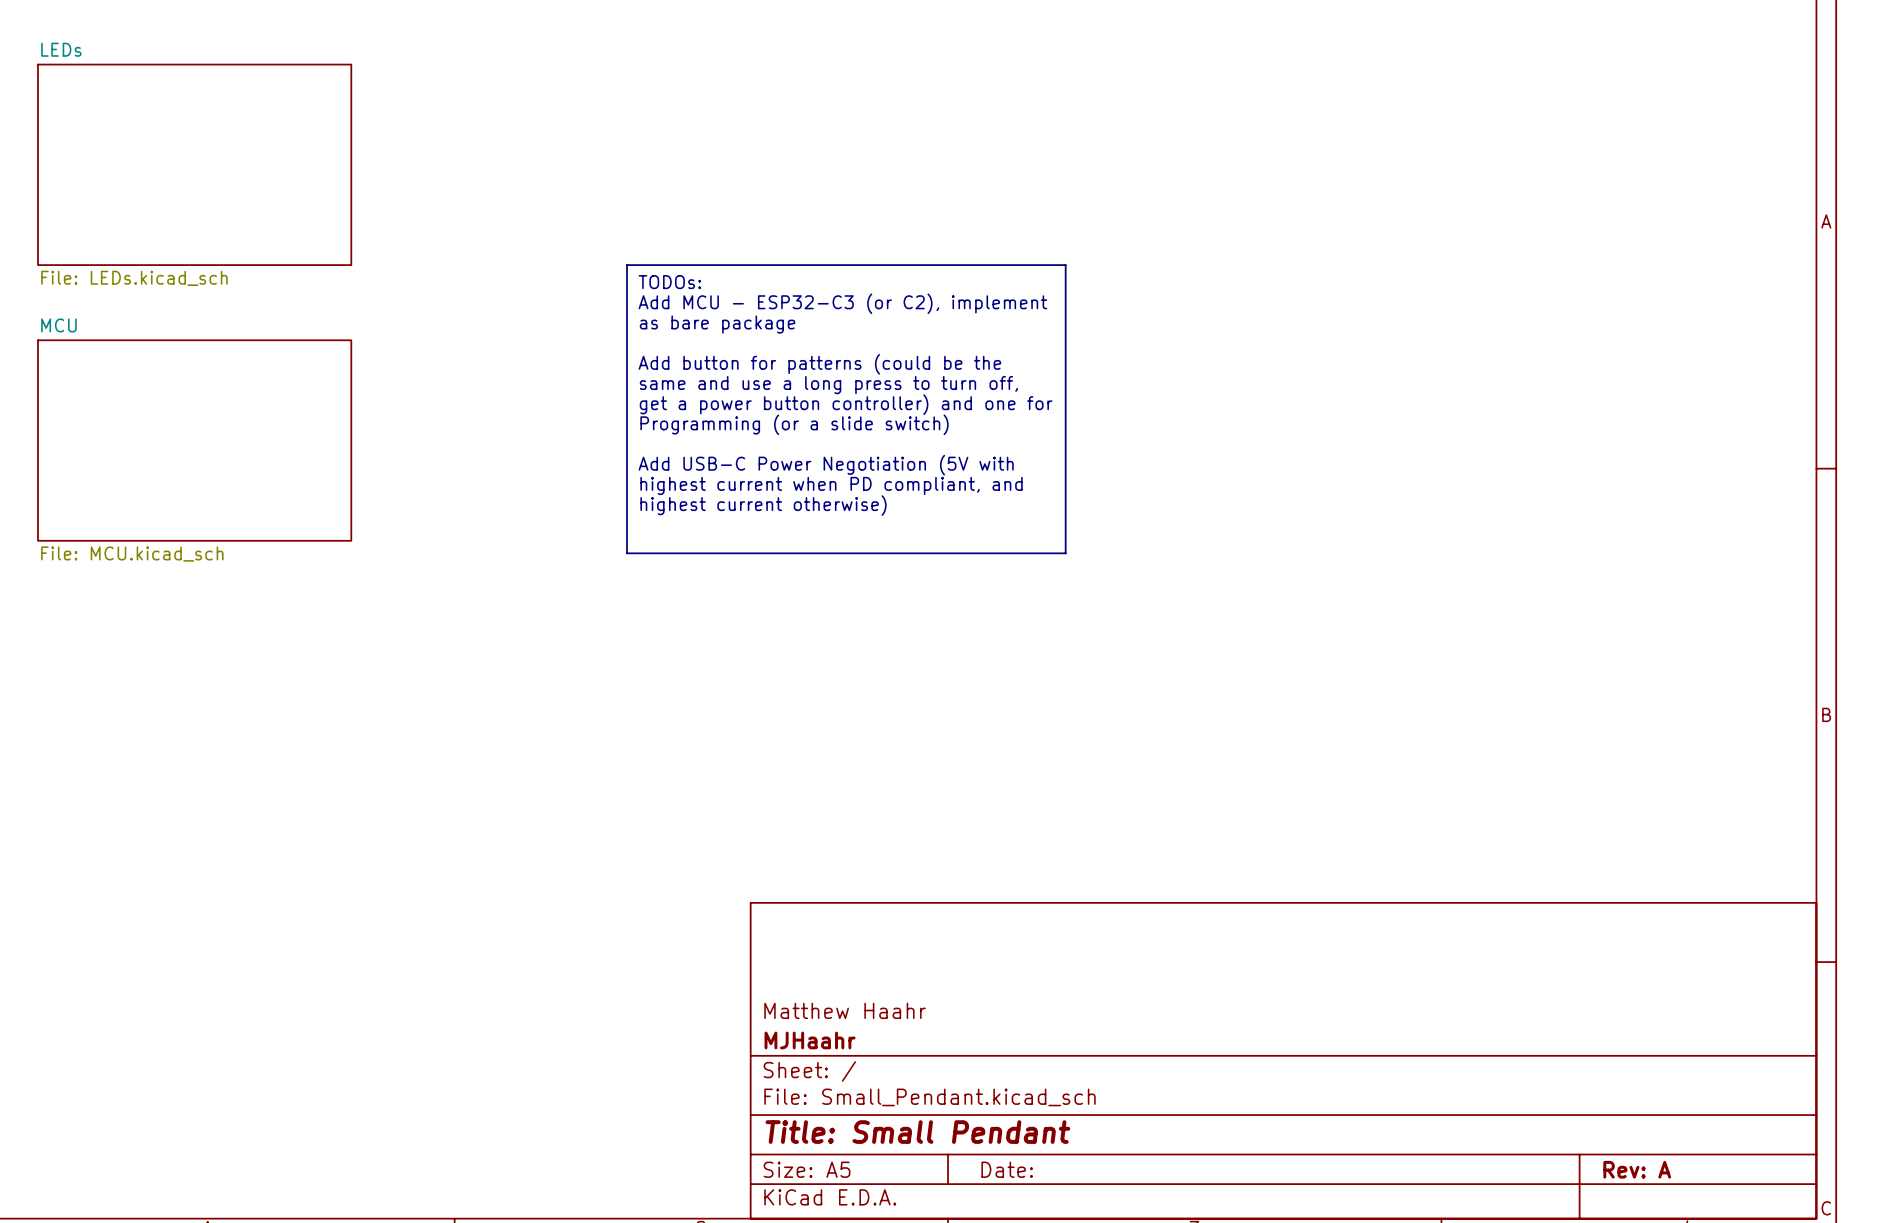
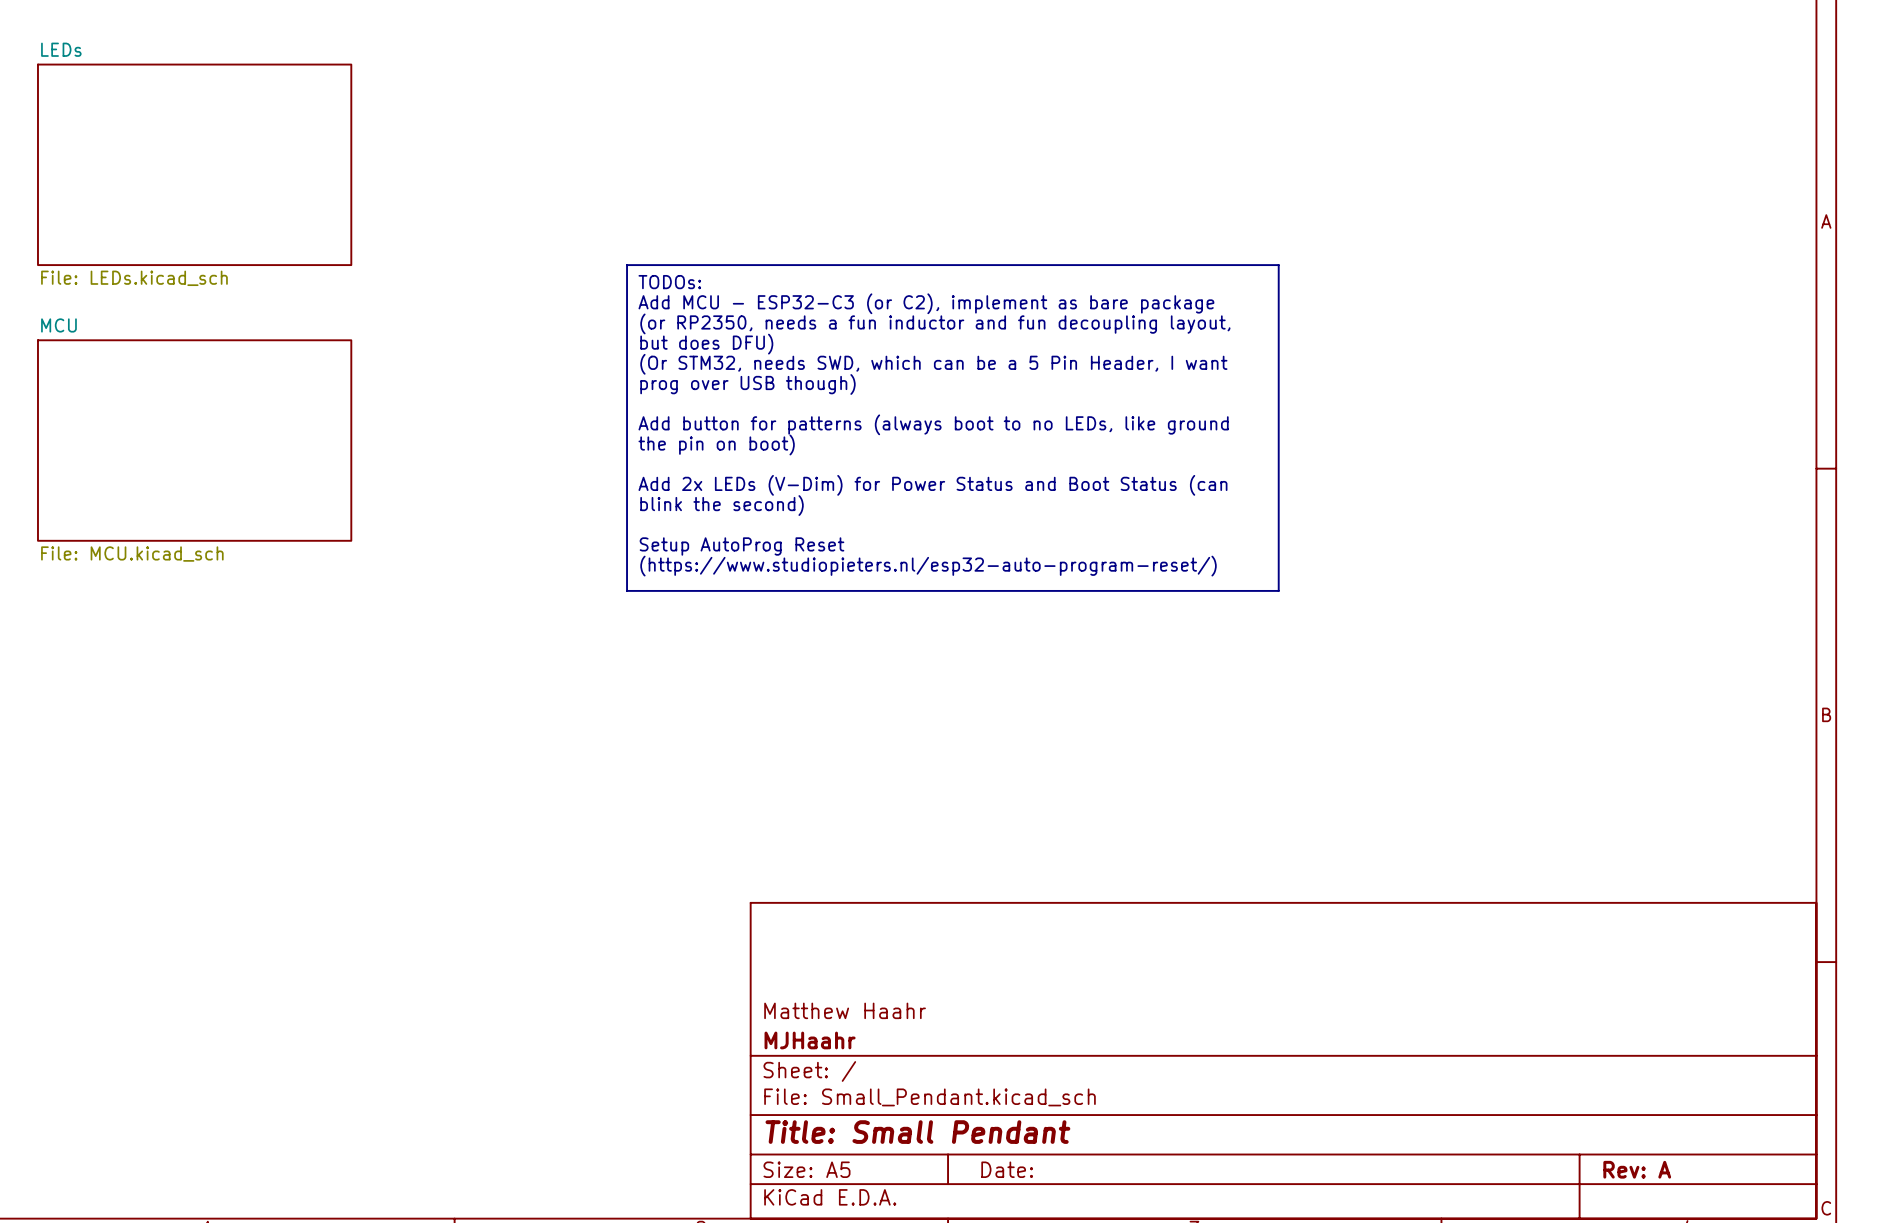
line: (1065, 265) (1065, 553) (627, 553) -> (1065, 265) (1278, 265) (1278, 590) (627, 590) (627, 553)
text: Add MCU - ESP32-C3 (or C2), implement (842, 303) -> Add MCU - ESP32-C3 (or C2), implement as bare package (926, 303)
text: as bare package (717, 324) -> (or RP2350, needs a fun inductor and fun decoupling layout, (935, 323)
text: none -> but does DFU) (706, 344)
text: Add button for patterns (could be the (819, 364) -> (Or STM32, needs SWD, which can be a 5 Pin Header, I want (933, 364)
text: same and use a long press to turn off, (828, 385) -> prog over USB though) (747, 384)
text: get a power button controller) and one for (846, 404) -> none
text: Programming (or a slide switch) (794, 424) -> Add button for patterns (always boot to no LEDs, like ground (933, 424)
text: none -> the pin on boot) (716, 445)
text: Add USB-C Power Negotiation (5V with (826, 465) -> none
text: highest current when PD compliant, and (831, 485) -> Add 2x LEDs (V-Dim) for Power Status and Boot Status (can (932, 485)
text: highest current otherwise) (763, 505) -> blink the second) (722, 505)
text: none -> Setup AutoProg Reset (742, 546)
text: none -> (https://www.studiopieters.nl/esp32-auto-program-reset/) (928, 566)

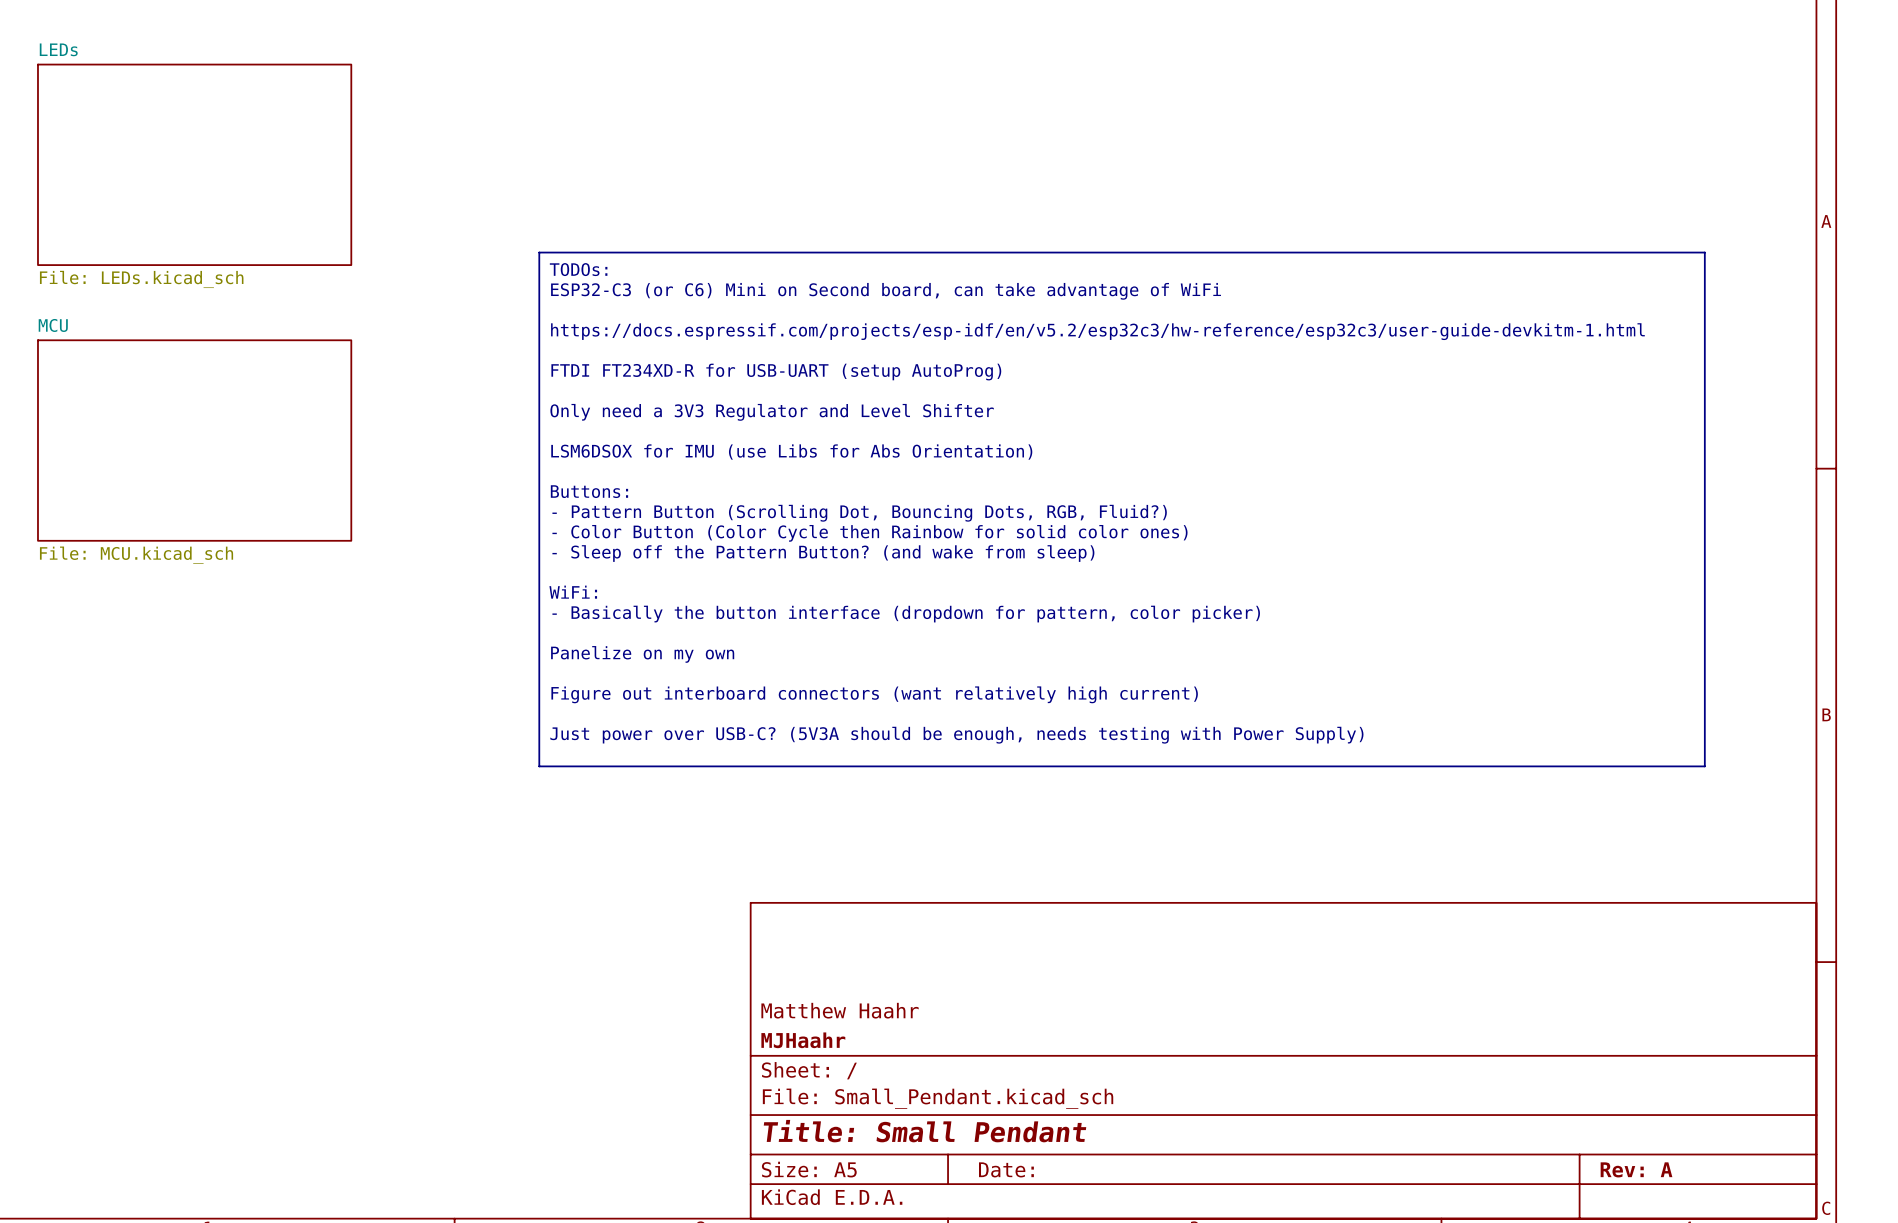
line: none -> (539, 252) (1704, 252) (1704, 766) (539, 766) (539, 252)
line: (627, 265) (1278, 265) (1278, 590) (627, 590) (627, 265) -> none
text position: TODOs: (669, 282) -> TODOs: (578, 269)
text: none -> ESP32-C3 (or C6) Mini on Second board, can take advantage of WiFi (886, 291)
text: Add MCU - ESP32-C3 (or C2), implement as bare package (926, 303) -> none
text: (or RP2350, needs a fun inductor and fun decoupling layout, (935, 323) -> none
text: none -> https://docs.espressif.com/projects/esp-idf/en/v5.2/esp32c3/hw-reference/esp32c3/user-guide-devkitm-1.html (1097, 331)
text: but does DFU) (706, 344) -> none
text: (Or STM32, needs SWD, which can be a 5 Pin Header, I want (933, 364) -> none
text: none -> FTDI FT234XD-R for USB-UART (setup AutoProg) (776, 372)
text: prog over USB though) (747, 384) -> none
text: none -> Only need a 3V3 Regulator and Level Shifter (772, 412)
text: Add button for patterns (always boot to no LEDs, like ground (933, 424) -> none
text: the pin on boot) (716, 445) -> none
text: none -> LSM6DSOX for IMU (use Libs for Abs Orientation) (791, 452)
text: Add 2x LEDs (V-Dim) for Power Status and Boot Status (can (932, 485) -> none
text: none -> Buttons: (589, 491)
text: blink the second) (722, 505) -> none
text: none -> - Pattern Button (Scrolling Dot, Bouncing Dots, RGB, Fluid?) (859, 513)
text: none -> - Color Button (Color Cycle then Rainbow for solid color ones) (869, 533)
text: Setup AutoProg Reset (742, 546) -> none
text: none -> - Sleep off the Pattern Button? (and wake from sleep) (823, 553)
text: (https://www.studiopieters.nl/esp32-auto-program-reset/) (928, 566) -> none
text: none -> WiFi: (573, 592)
text: none -> - Basically the button interface (dropdown for pattern, color picker) (906, 614)
text: none -> Panelize on my own (642, 654)
text: none -> Figure out interboard connectors (want relatively high current) (874, 694)
text: none -> Just power over USB-C? (5V3A should be enough, needs testing with Power Supply) (956, 735)

